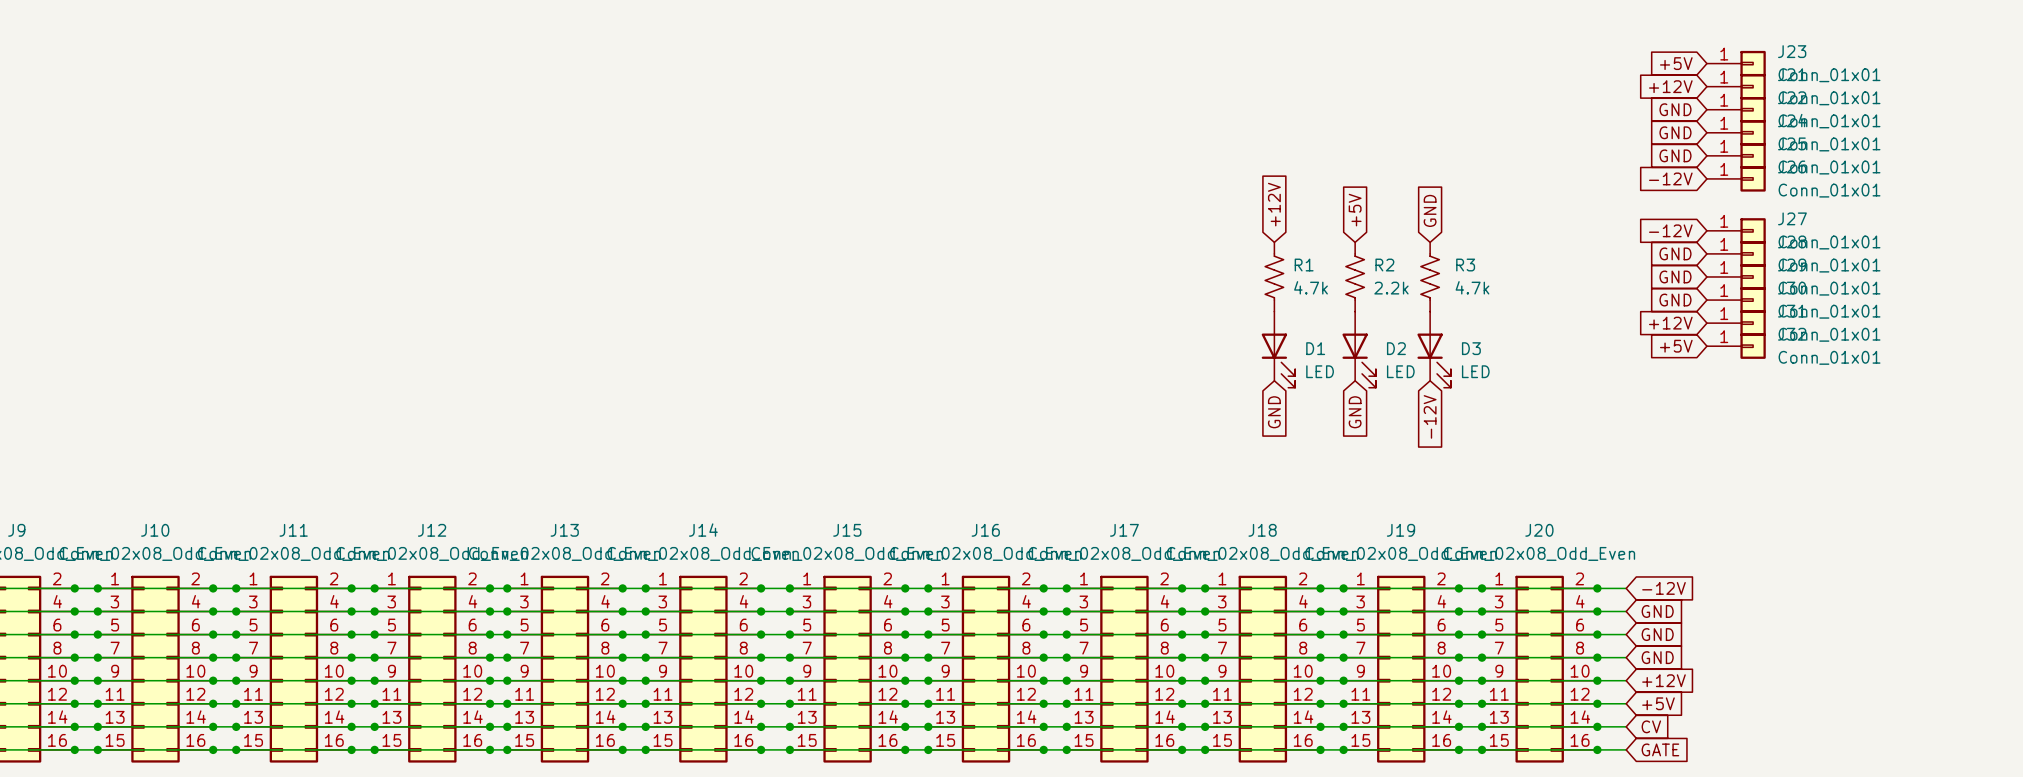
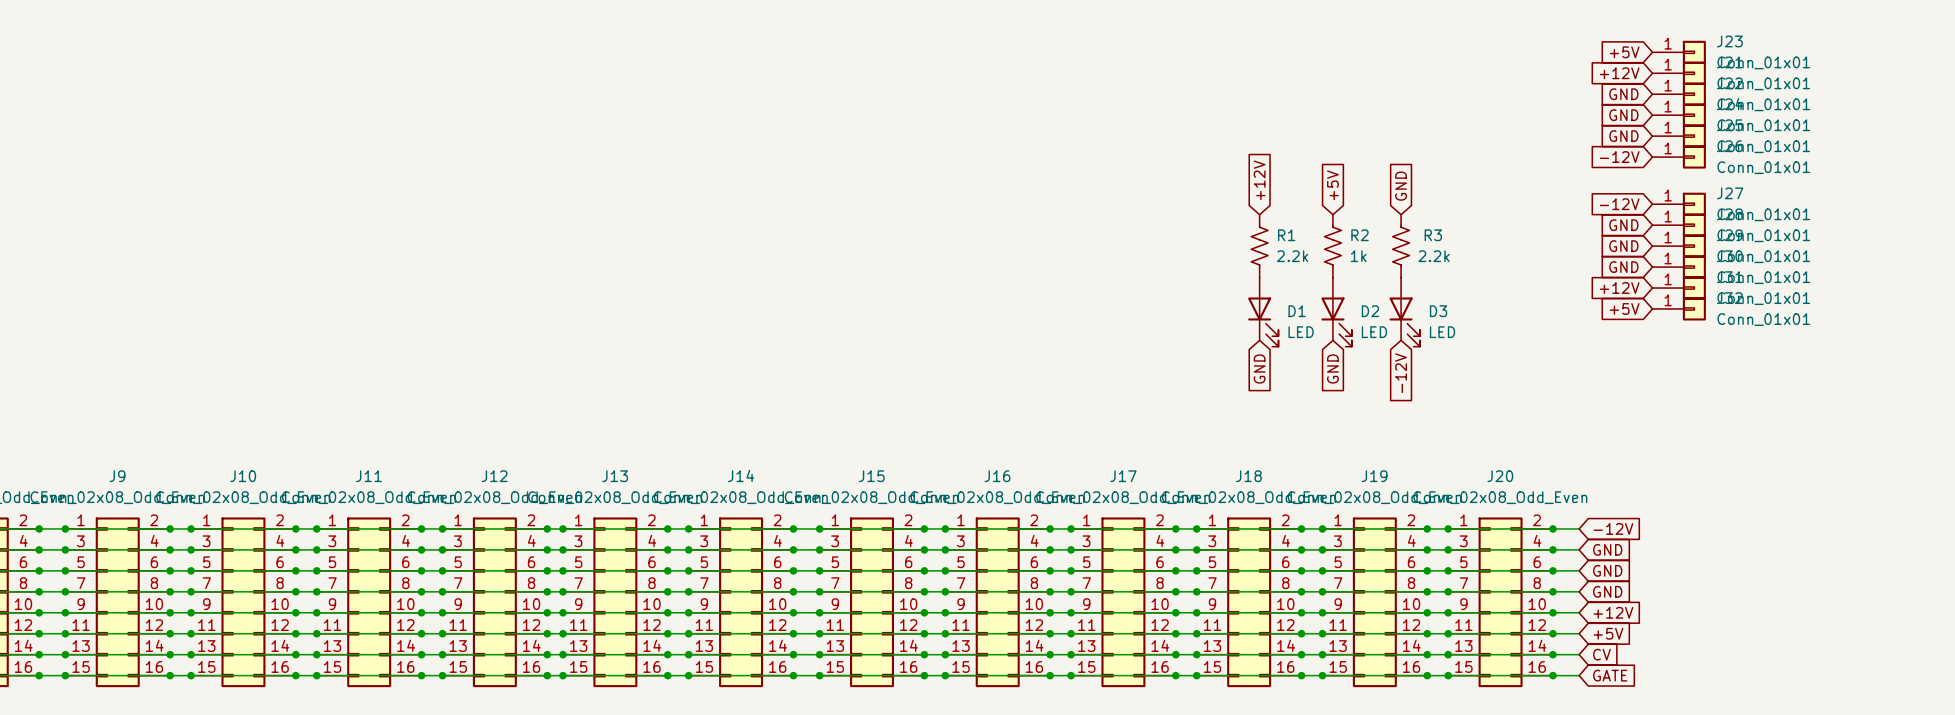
R1 value: 4.7k (1311, 287) -> 2.2k (1292, 256)
R3 value: 4.7k (1472, 287) -> 2.2k (1434, 256)
R2 value: 2.2k (1391, 288) -> 1k (1358, 256)

